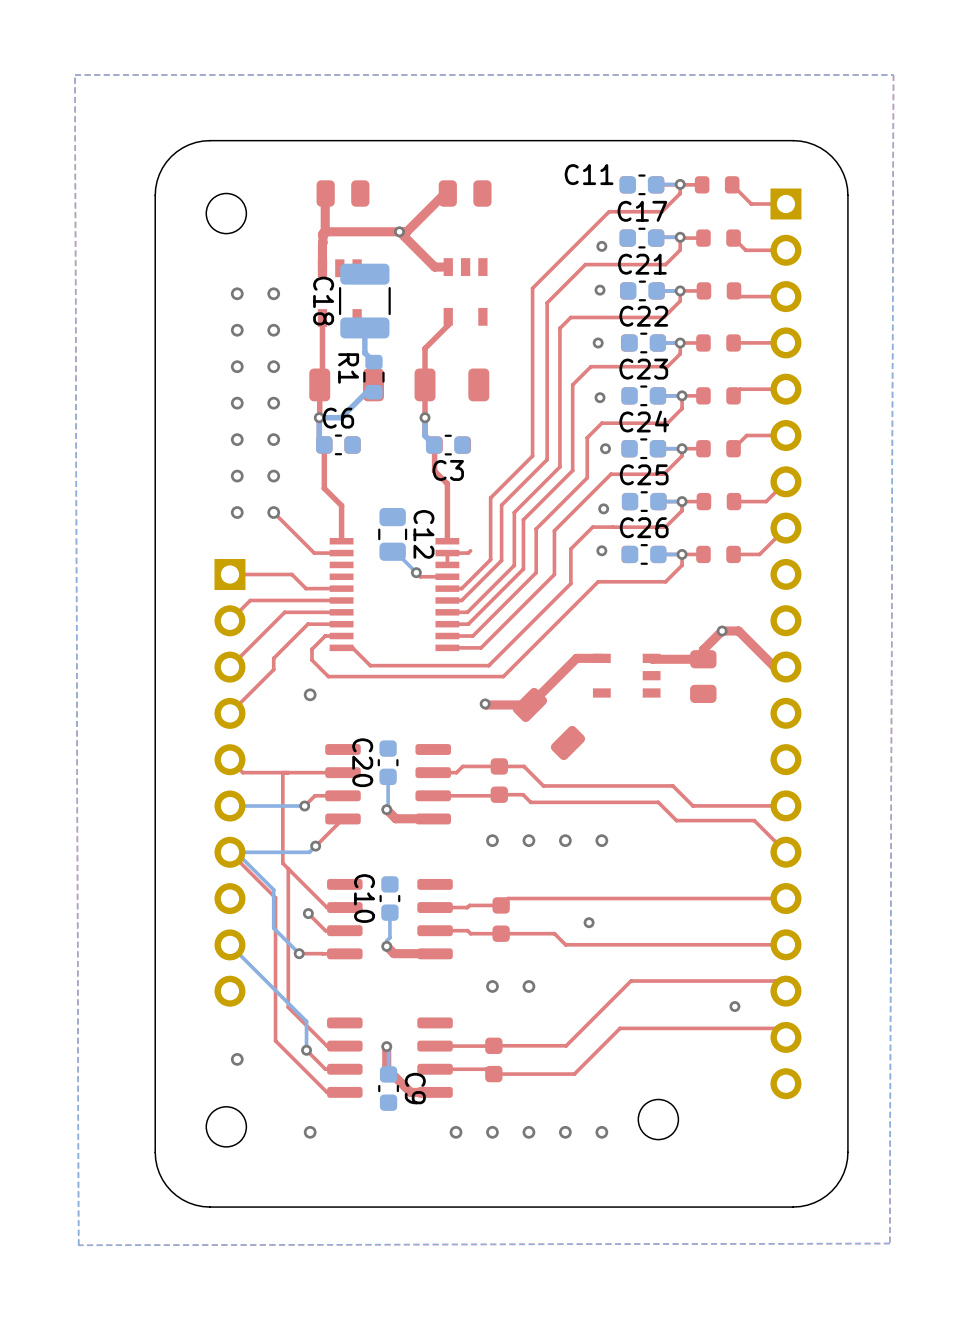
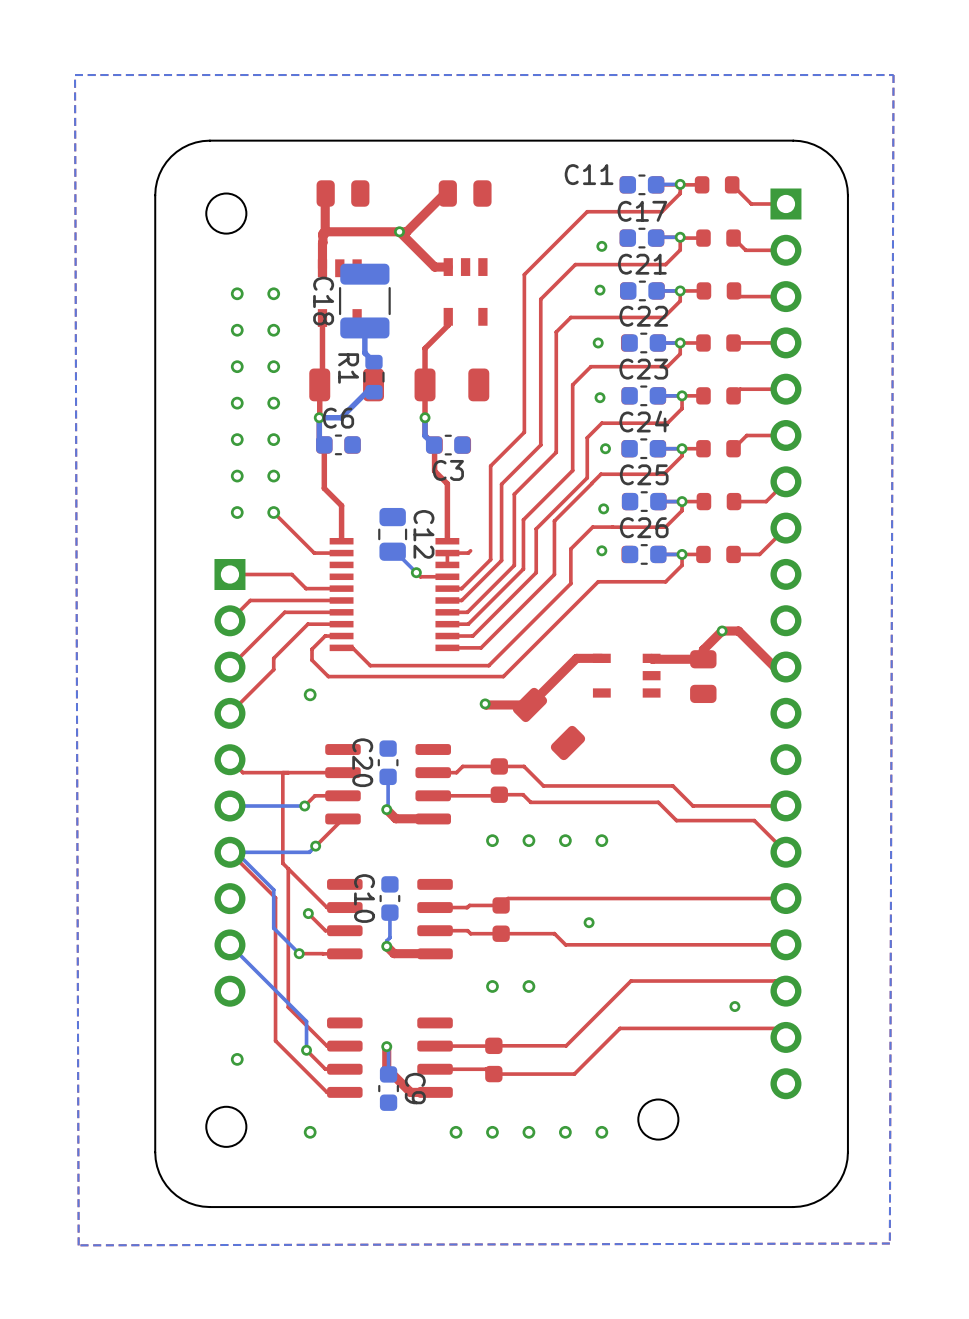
top track: (609, 211) (532, 288) (532, 456) (490, 497) -> (609, 211) (587, 211) (524, 274) (524, 432) (490, 466) (490, 497)
top track: (585, 264) (547, 302) (547, 459) (501, 505) -> (585, 264) (575, 264) (540, 299) (540, 445) (501, 484) (501, 505)
top track: (559, 328) (559, 466) (514, 512) -> (559, 328) (556, 332) (556, 452) (514, 494) (514, 512)
top track: (610, 474) (554, 530) -> (591, 483) (554, 521) (554, 530)
top track: none -> (610, 474) (600, 474) (591, 483)

